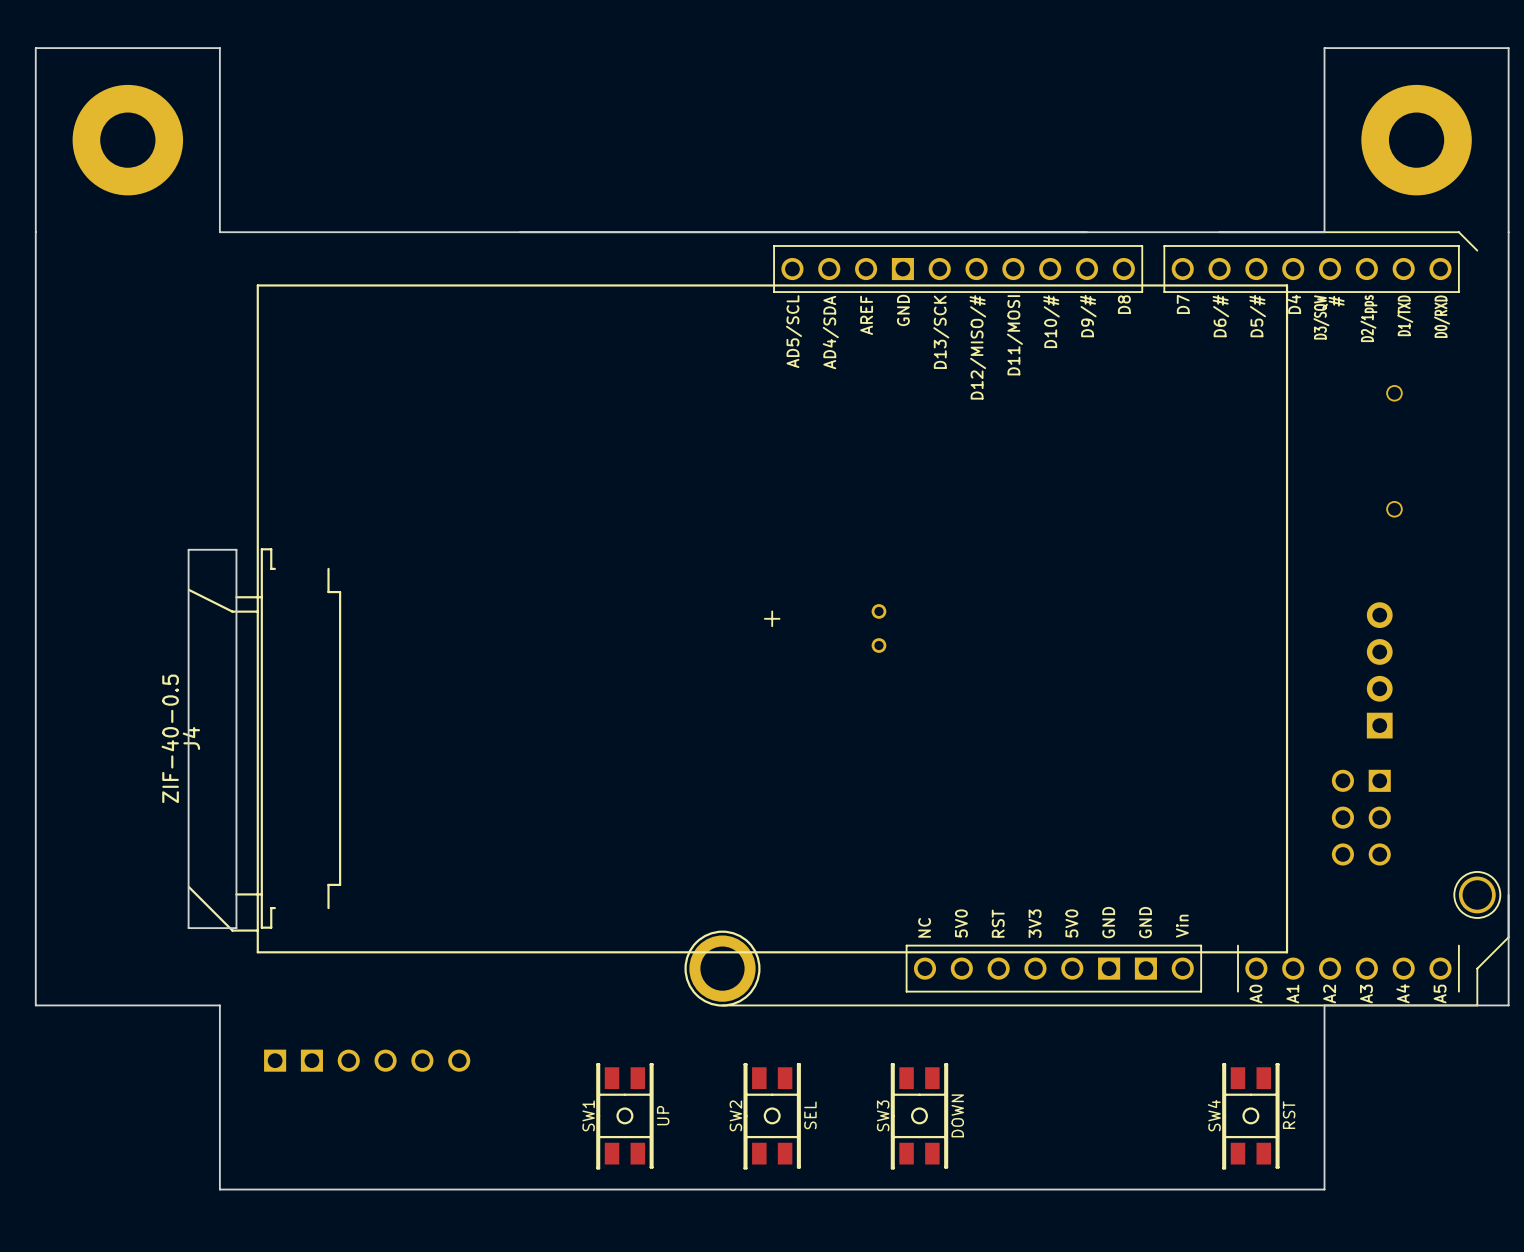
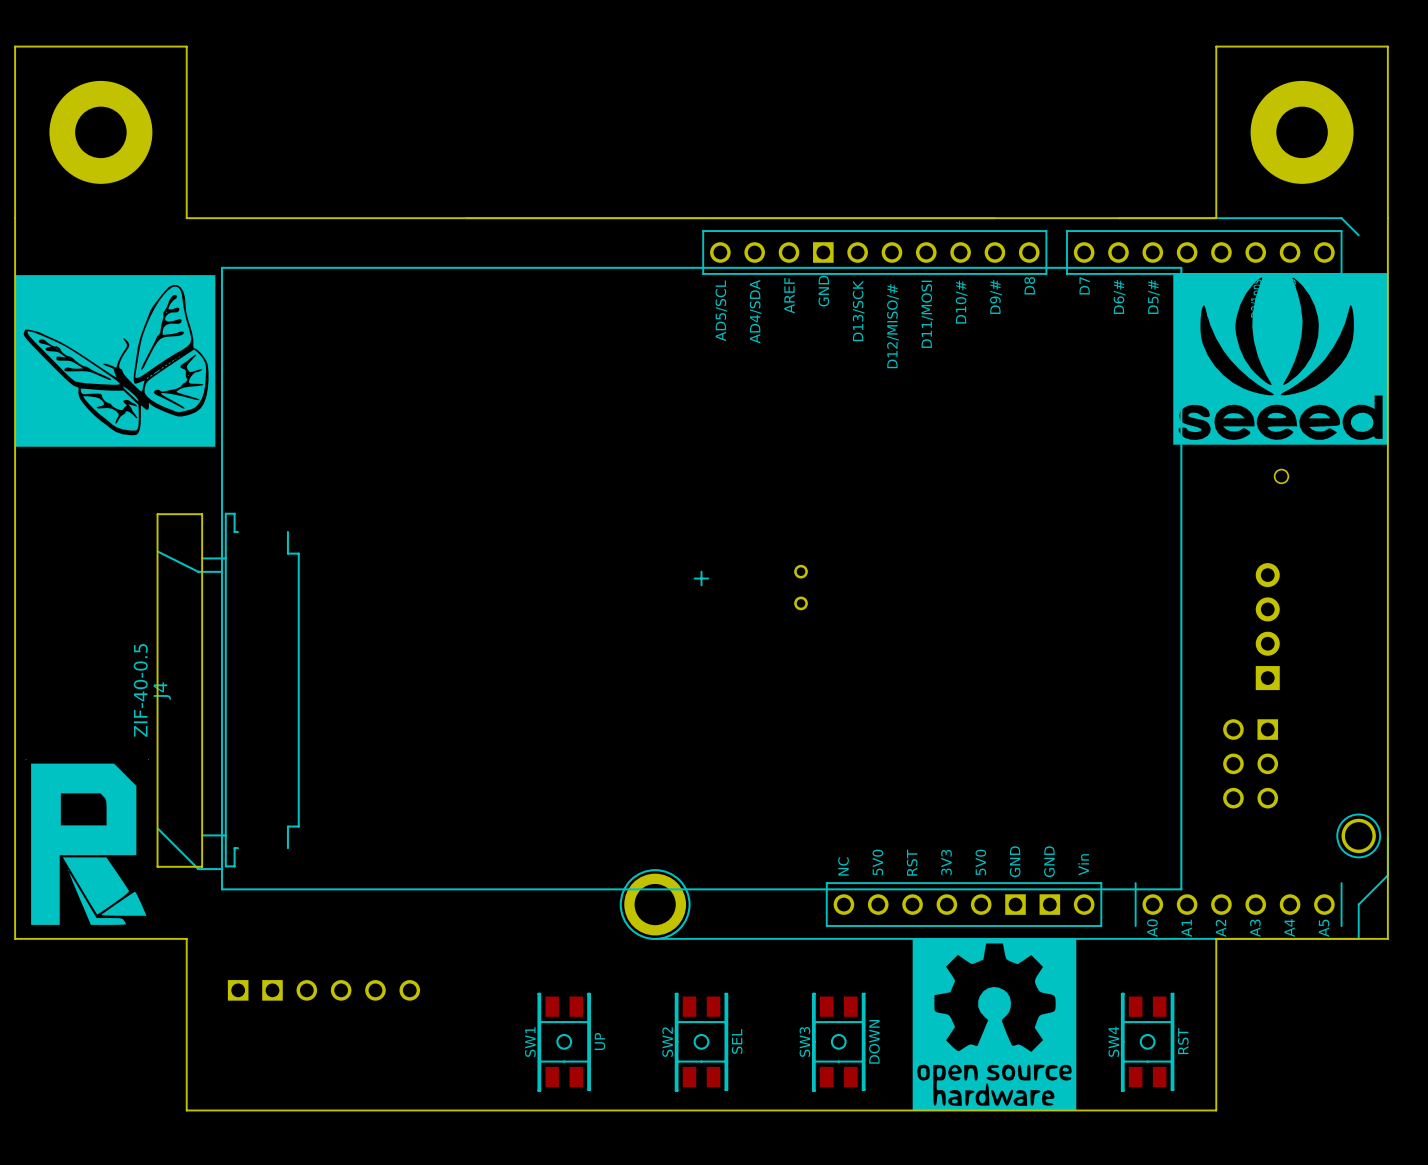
drawing: none -> [1173, 273, 1389, 445]
drawing: none -> [15, 275, 216, 447]
drawing: none -> [25, 759, 149, 925]
drawing: none -> [912, 938, 1077, 1111]

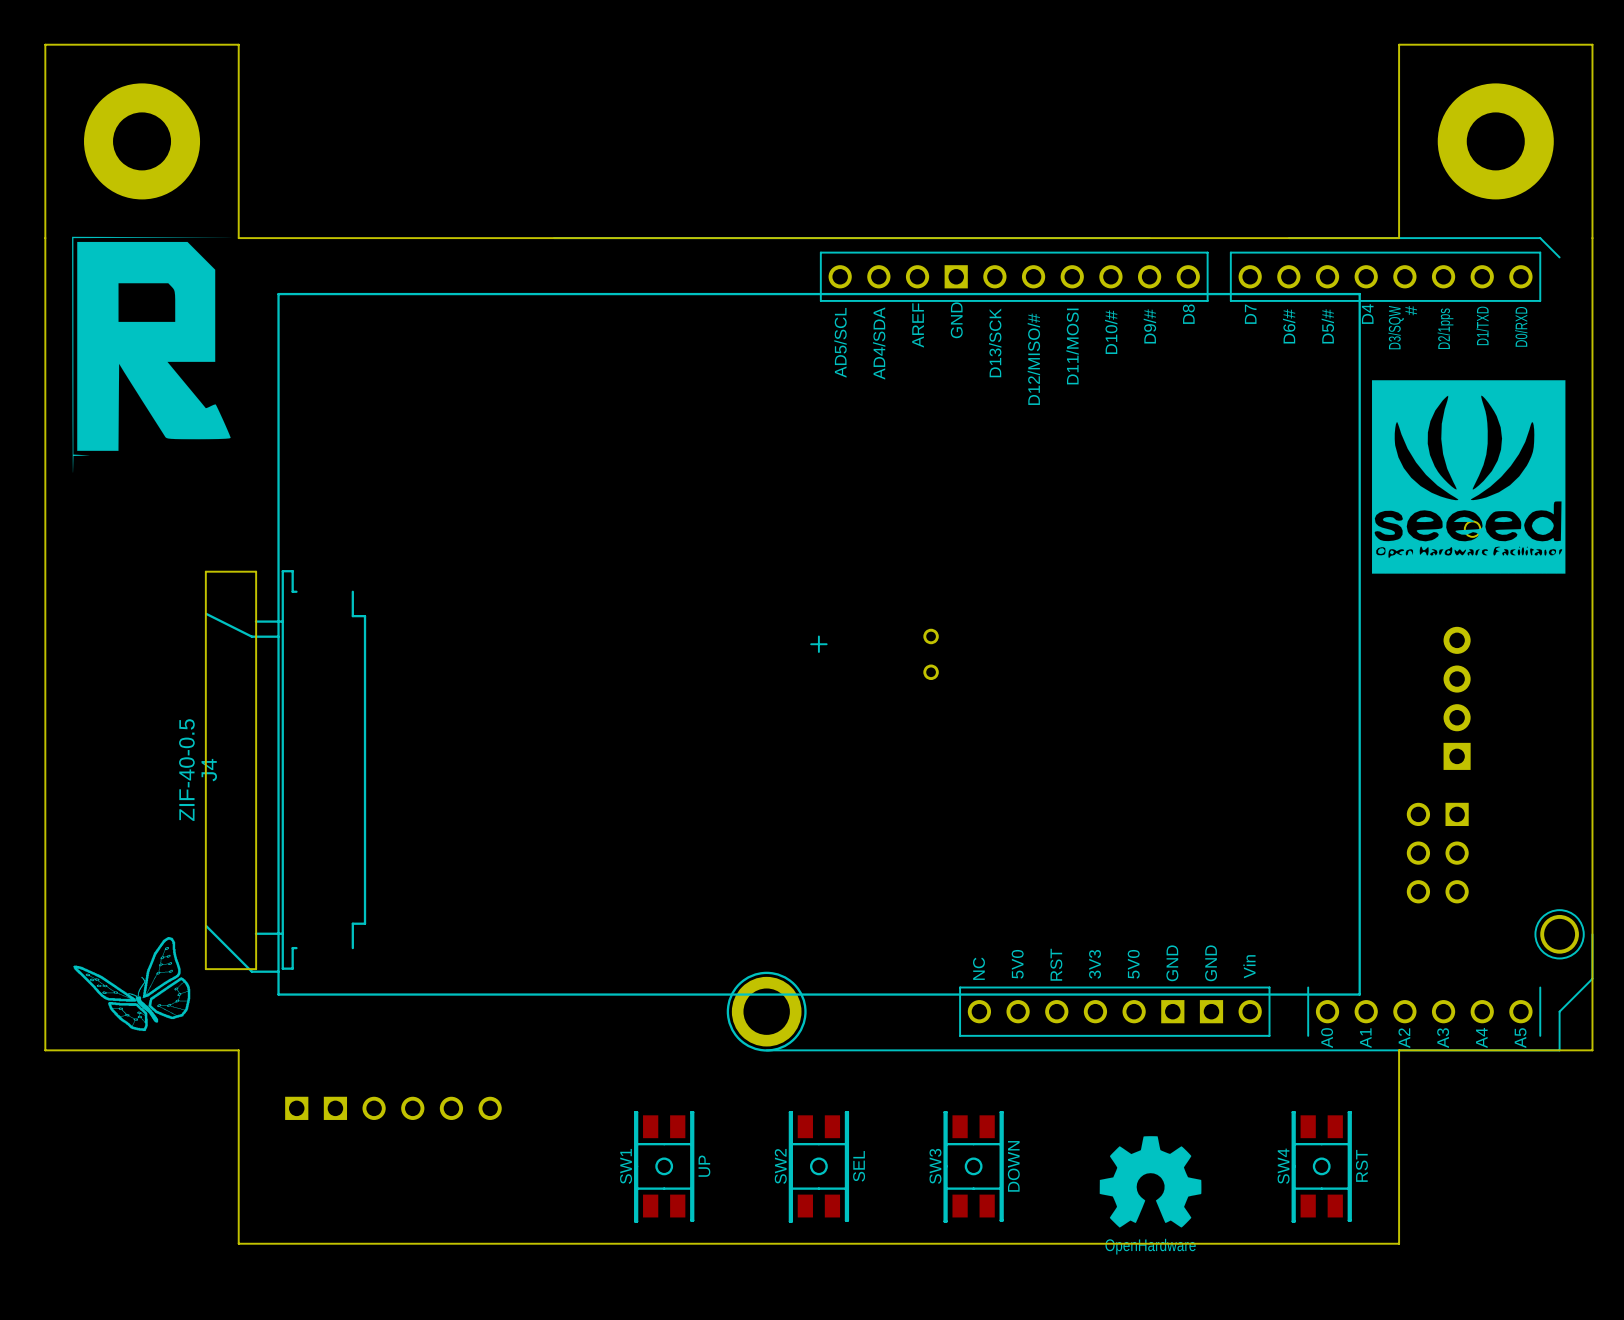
drawing: none -> [72, 236, 232, 473]
drawing: [1173, 273, 1389, 445] -> none
drawing: [15, 275, 216, 447] -> none
drawing: none -> [1371, 380, 1566, 574]
drawing: [25, 759, 149, 925] -> none
drawing: none -> [73, 937, 191, 1032]
drawing: [912, 938, 1077, 1111] -> none
drawing: none -> [1099, 1136, 1202, 1228]

